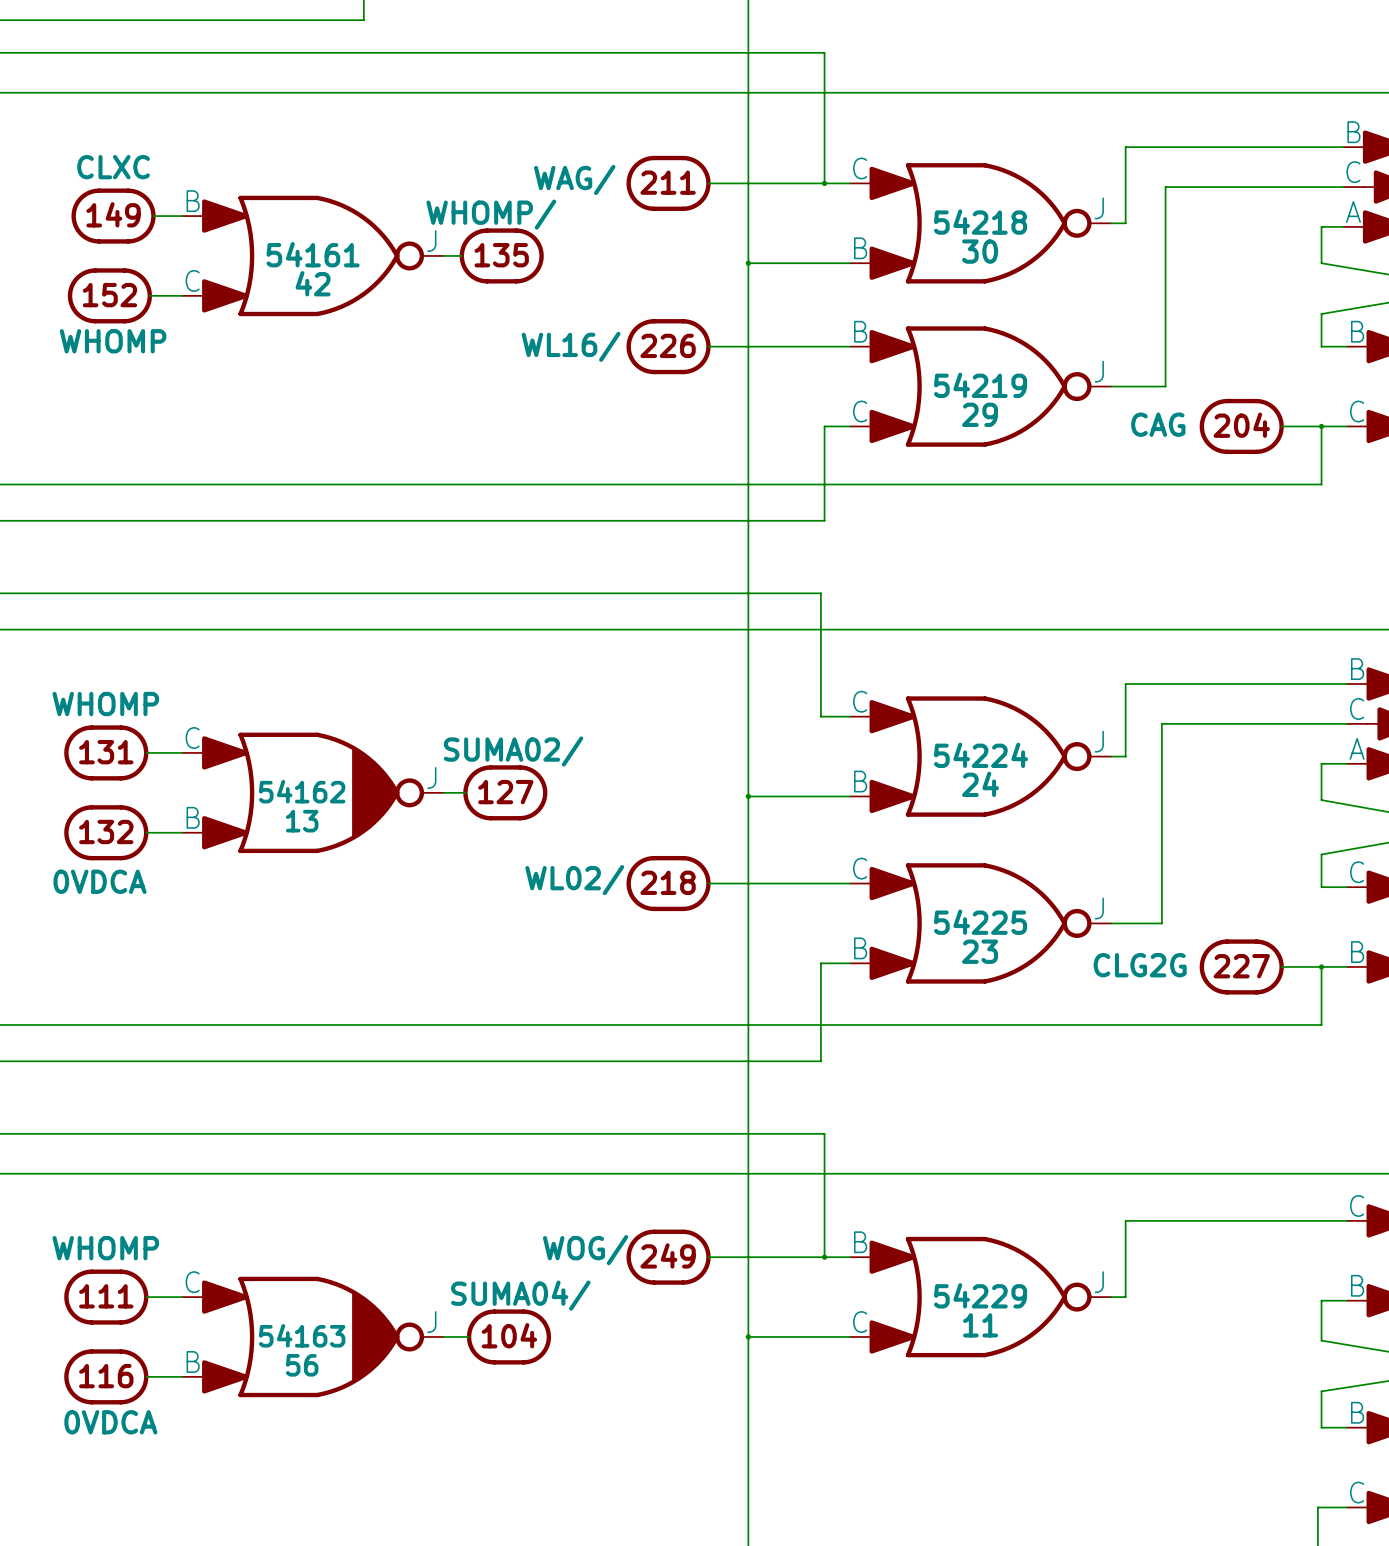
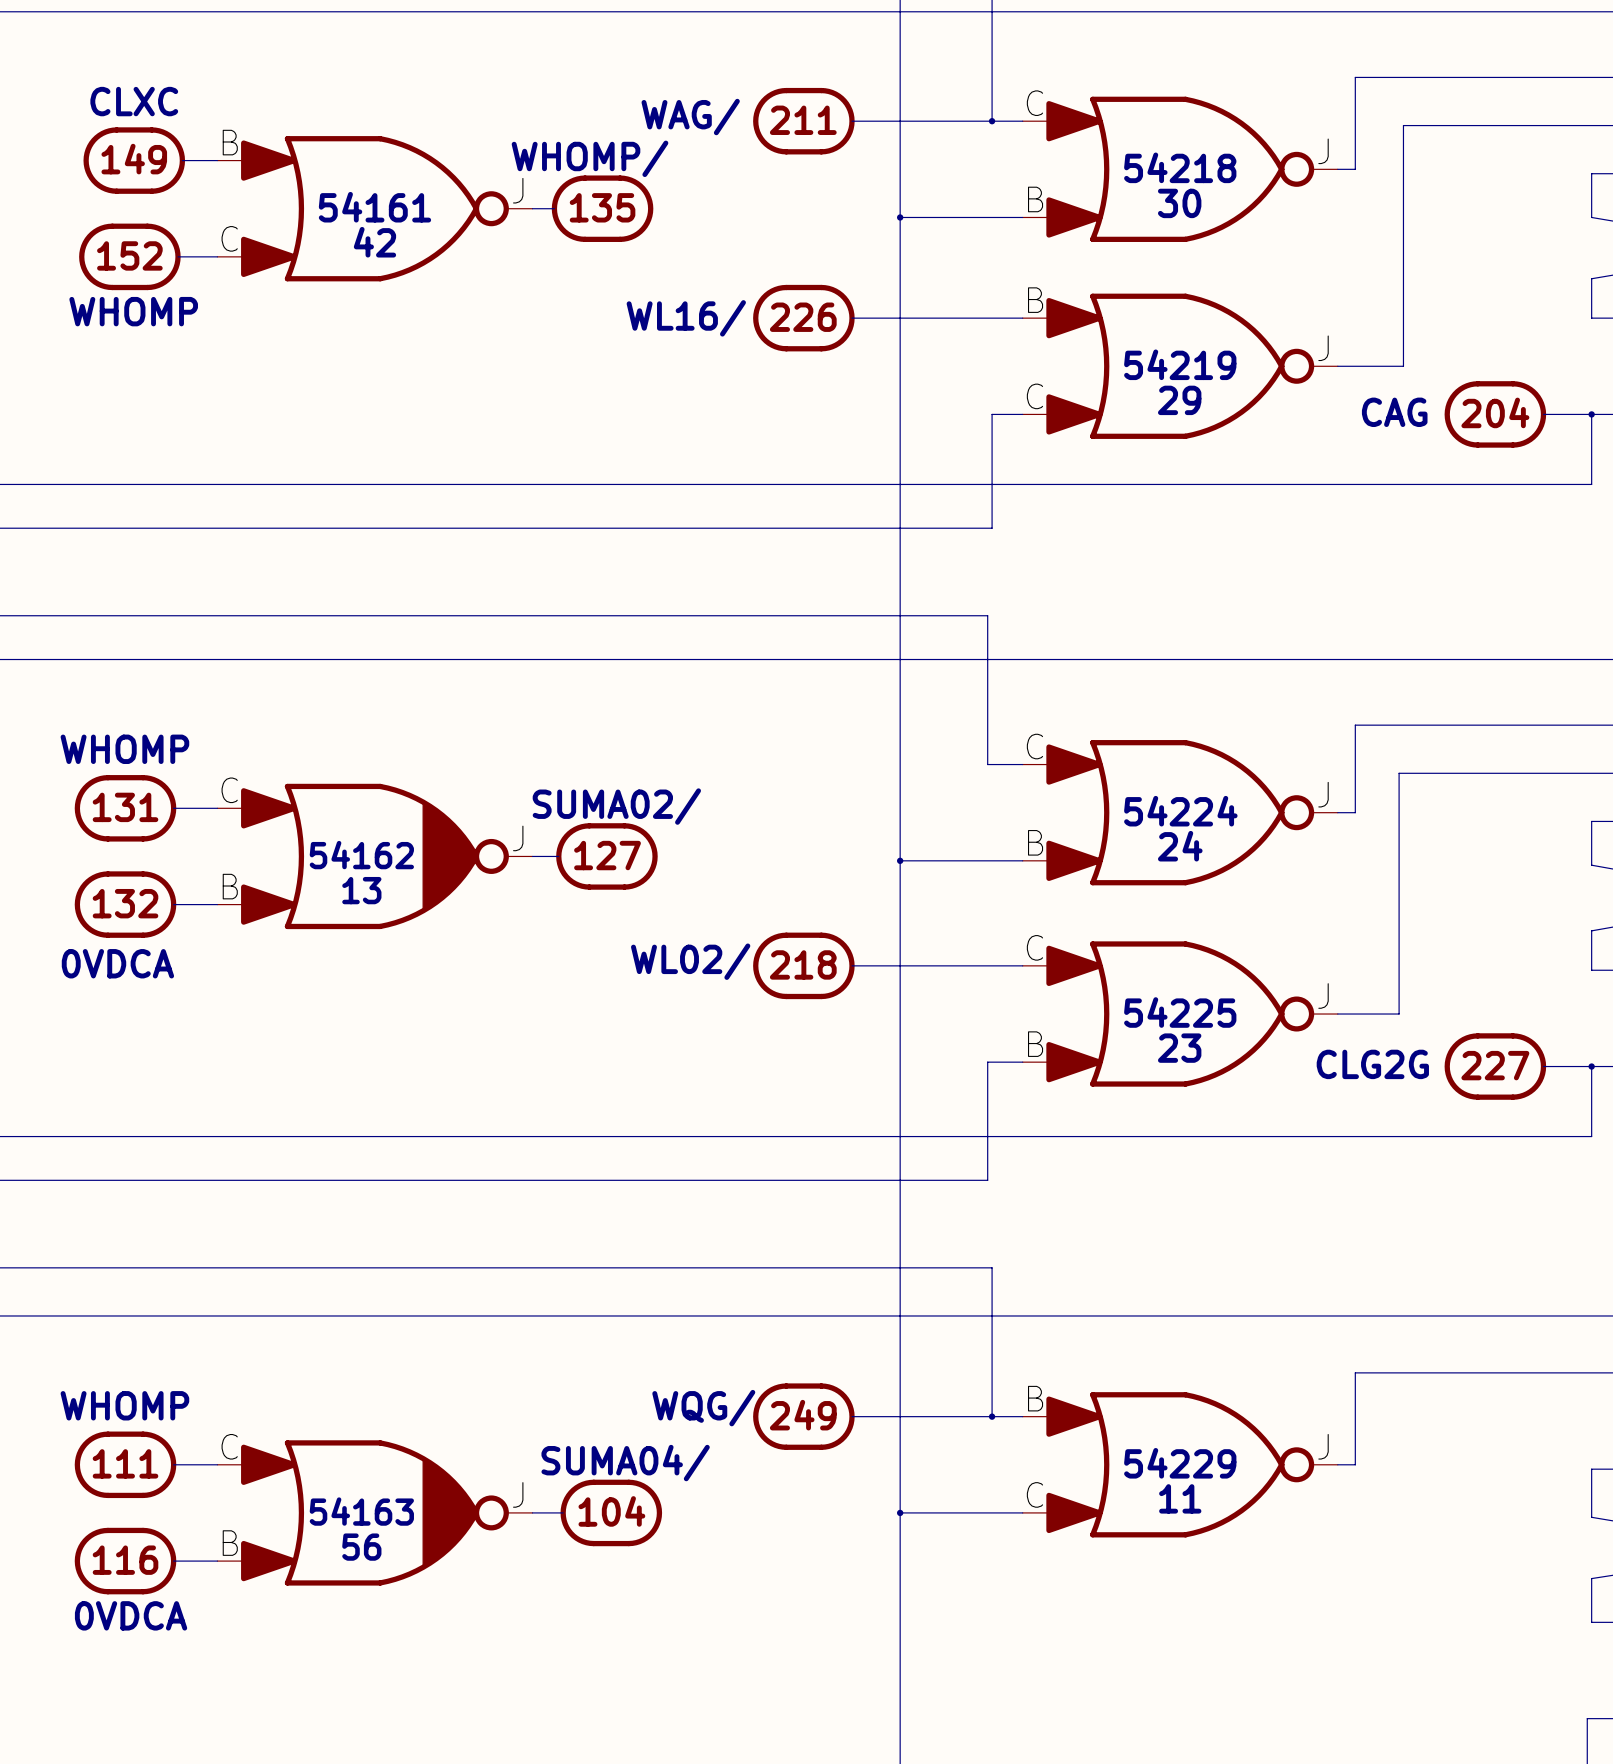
part text: WOG/ (585, 1250) -> WQG/ (703, 1408)

